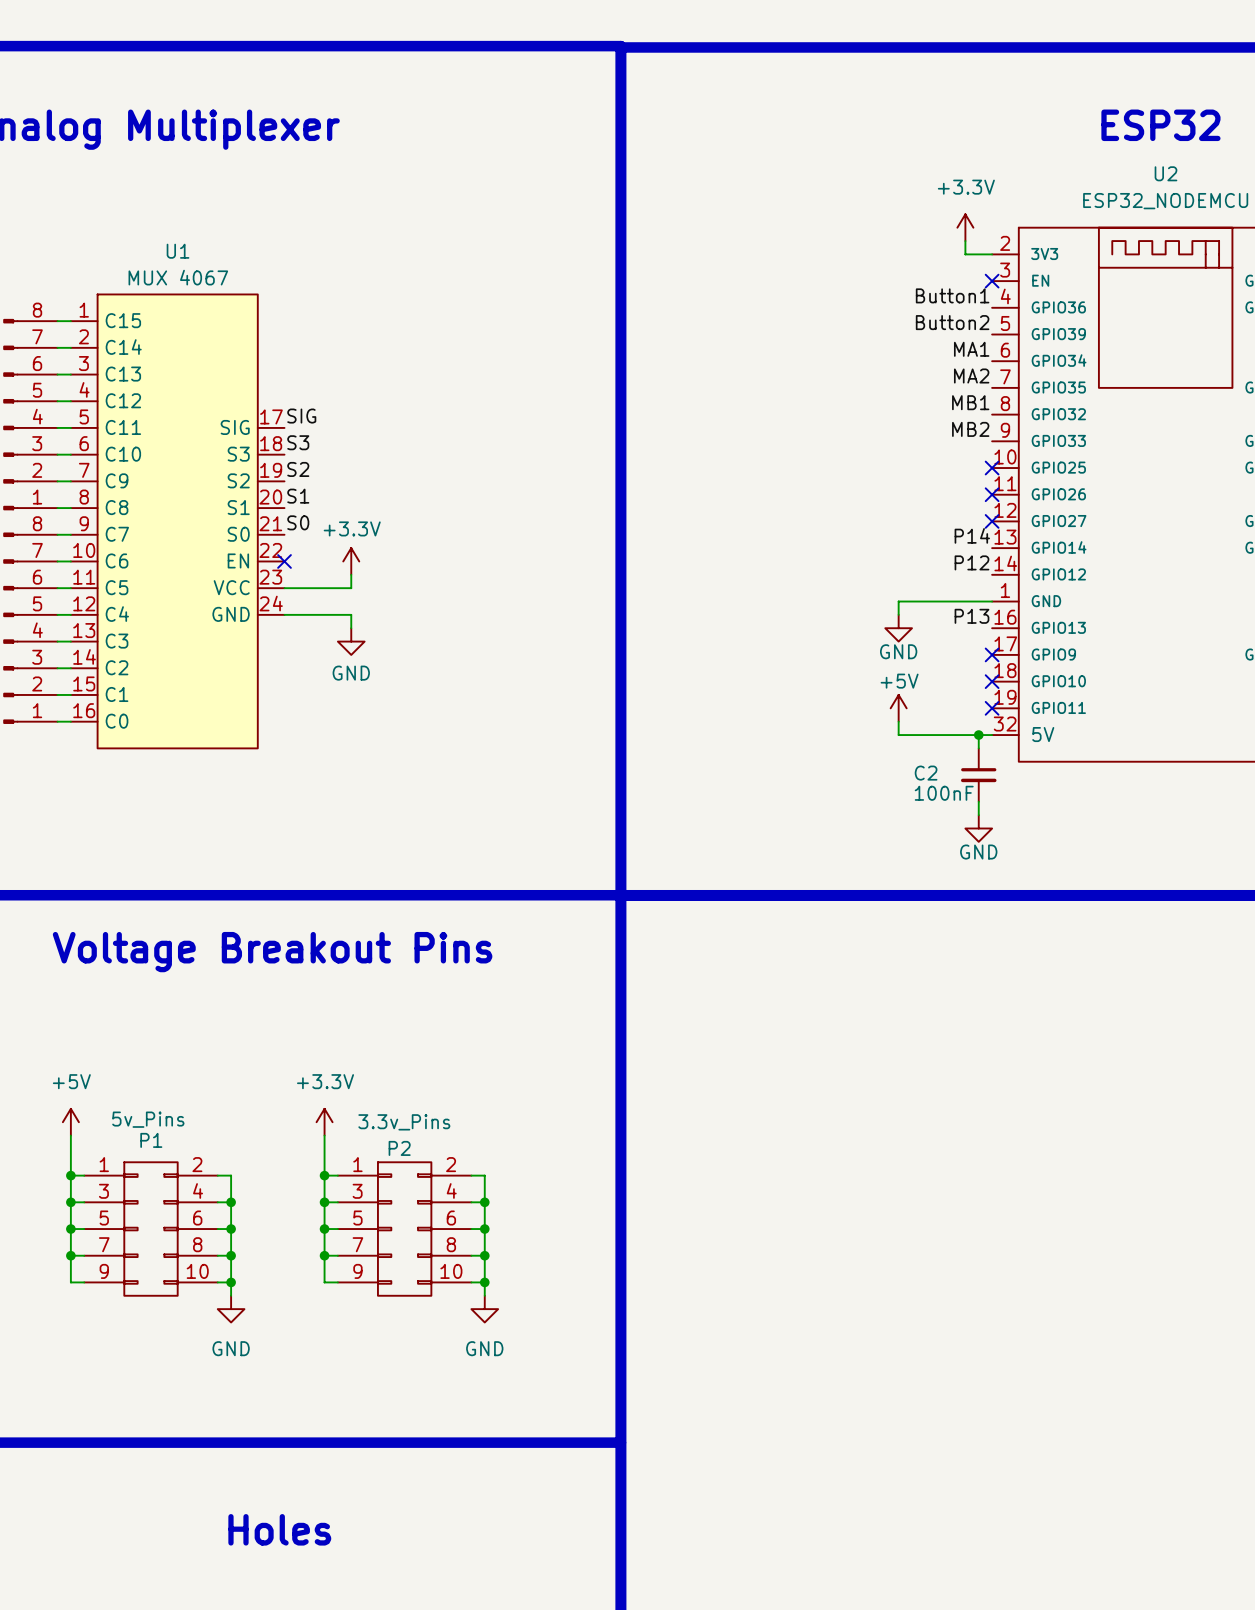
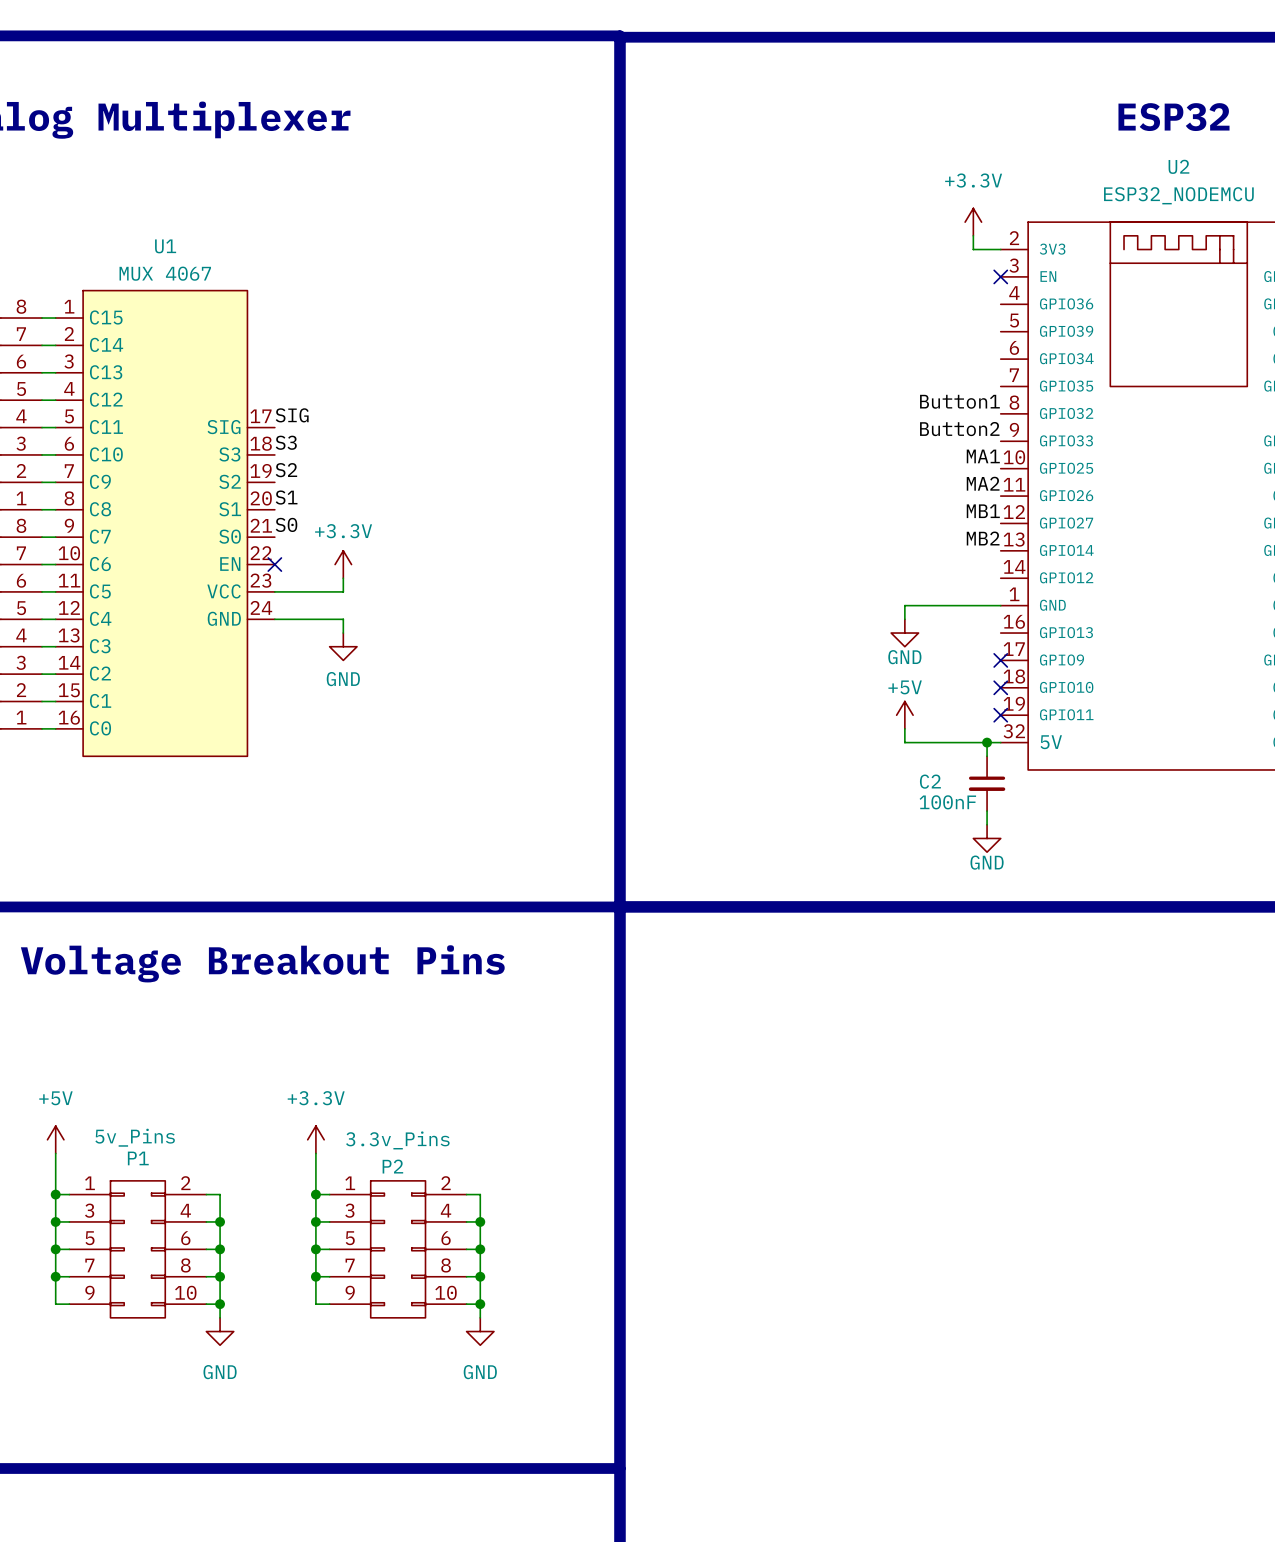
label: Button1 (952, 295) -> none
label: Button2 (952, 322) -> none
label position: MA1 (971, 349) -> MA1 (983, 456)
label position: MA2 (971, 375) -> MA2 (983, 483)
label: MB1 (970, 402) -> Button1 (959, 401)
label: MB2 (970, 429) -> Button2 (959, 429)
no-connect mark: (992, 468) -> none
no-connect mark: (992, 494) -> none
label: none -> MB1 (983, 511)
no-connect mark: (992, 521) -> none
label: P14 (972, 535) -> MB2 (983, 538)
label: P12 (971, 562) -> none
label: P13 (971, 616) -> none

